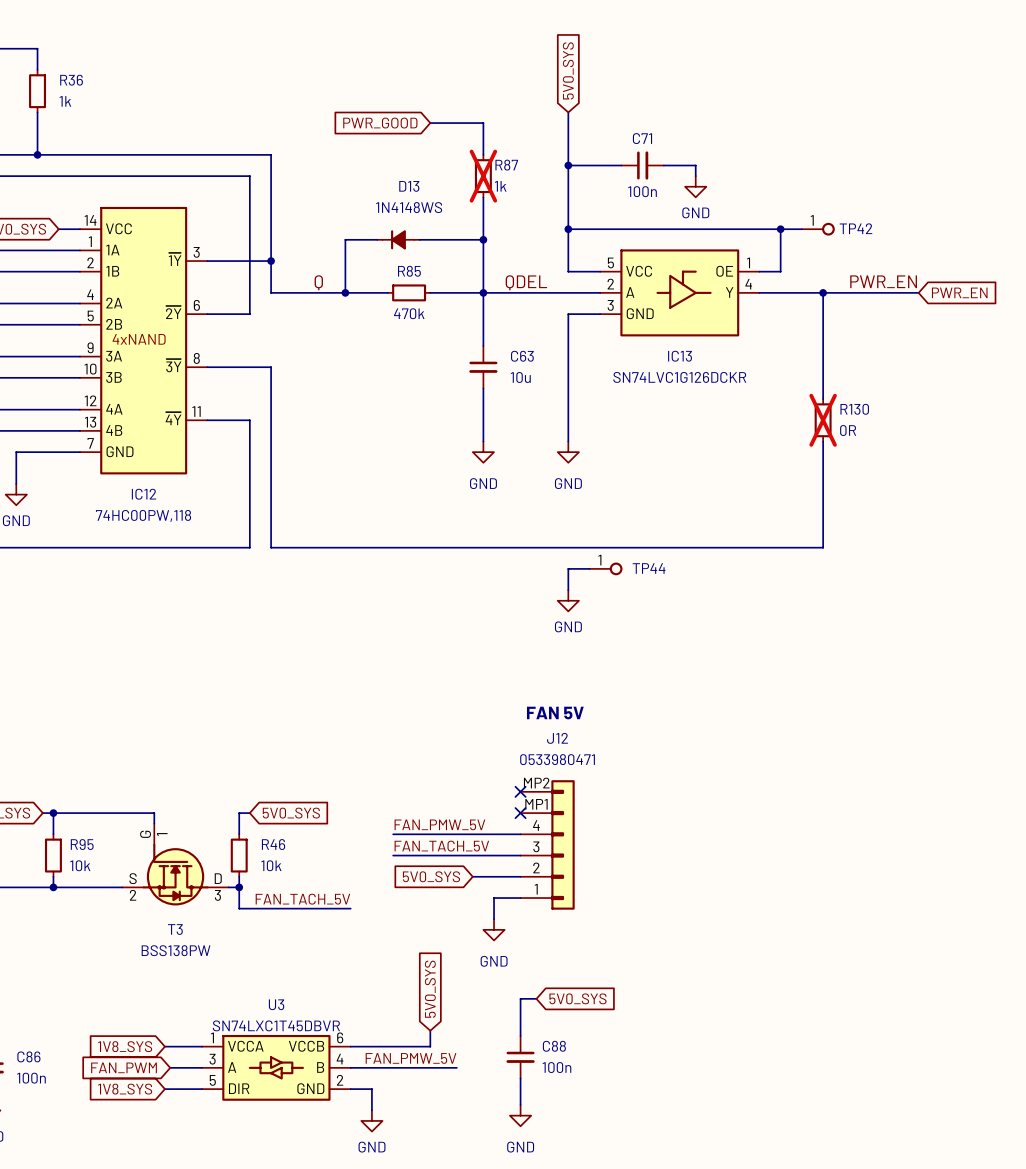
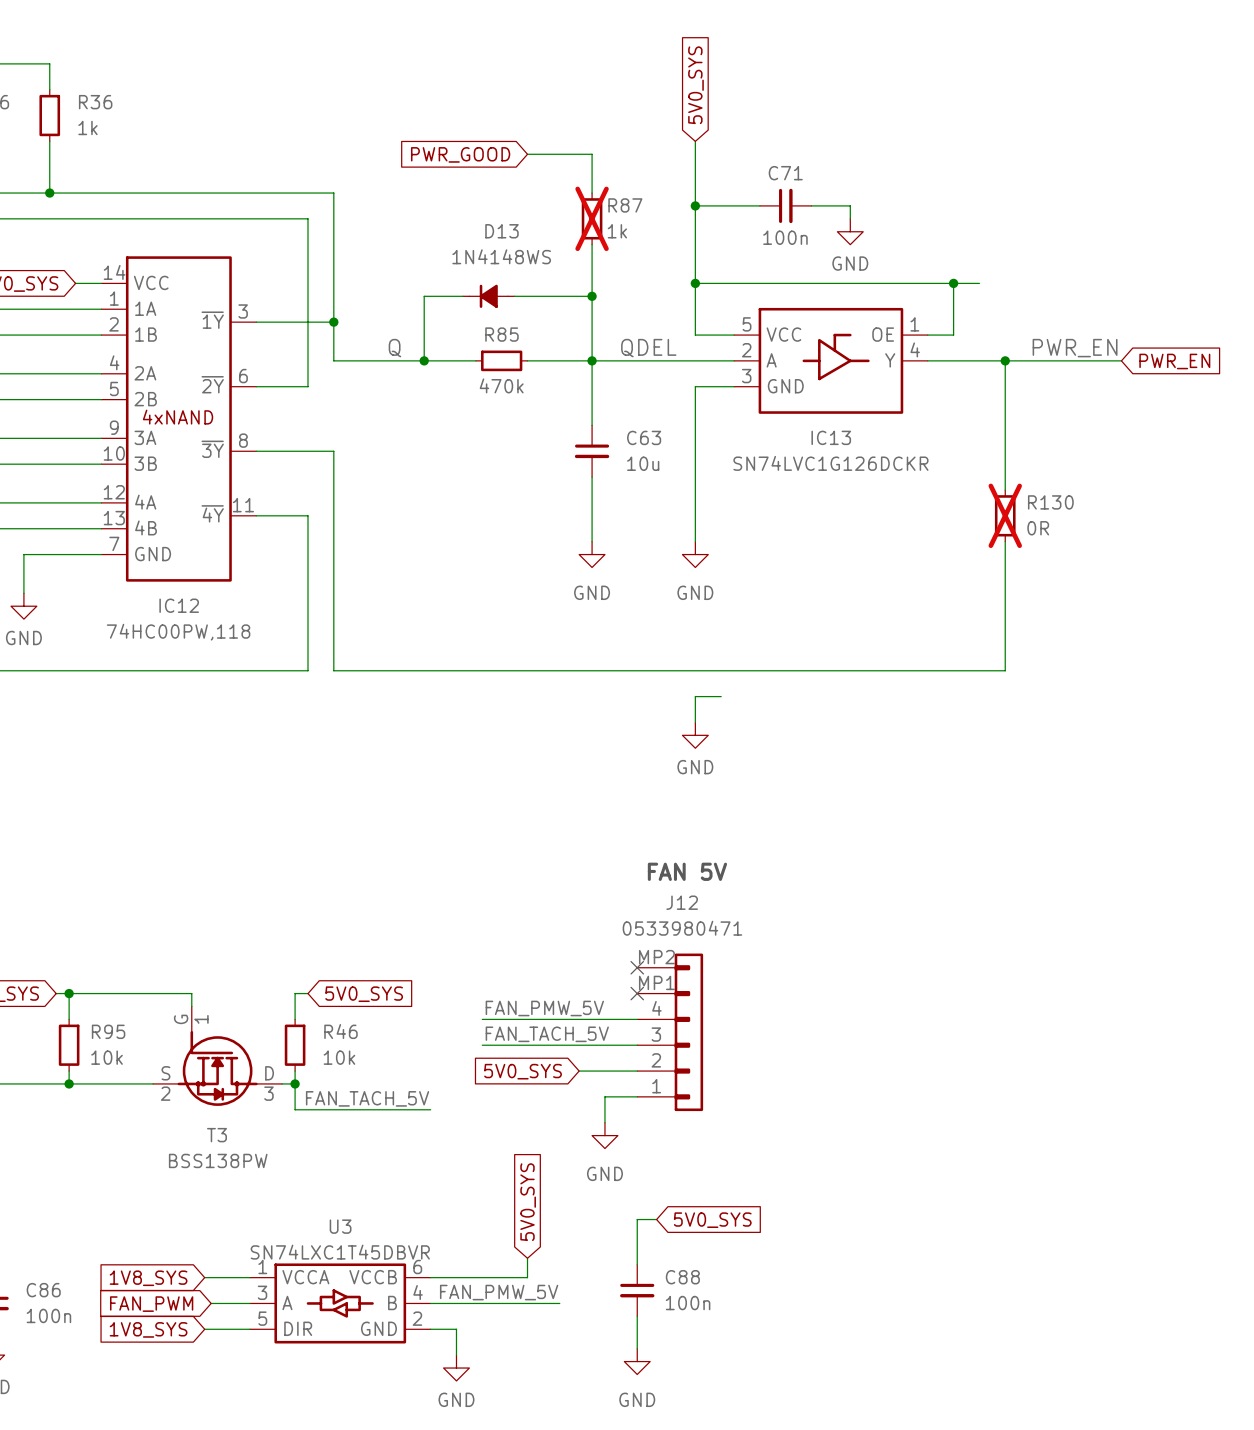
TP42: (818, 229) -> none
TP44: (606, 568) -> none

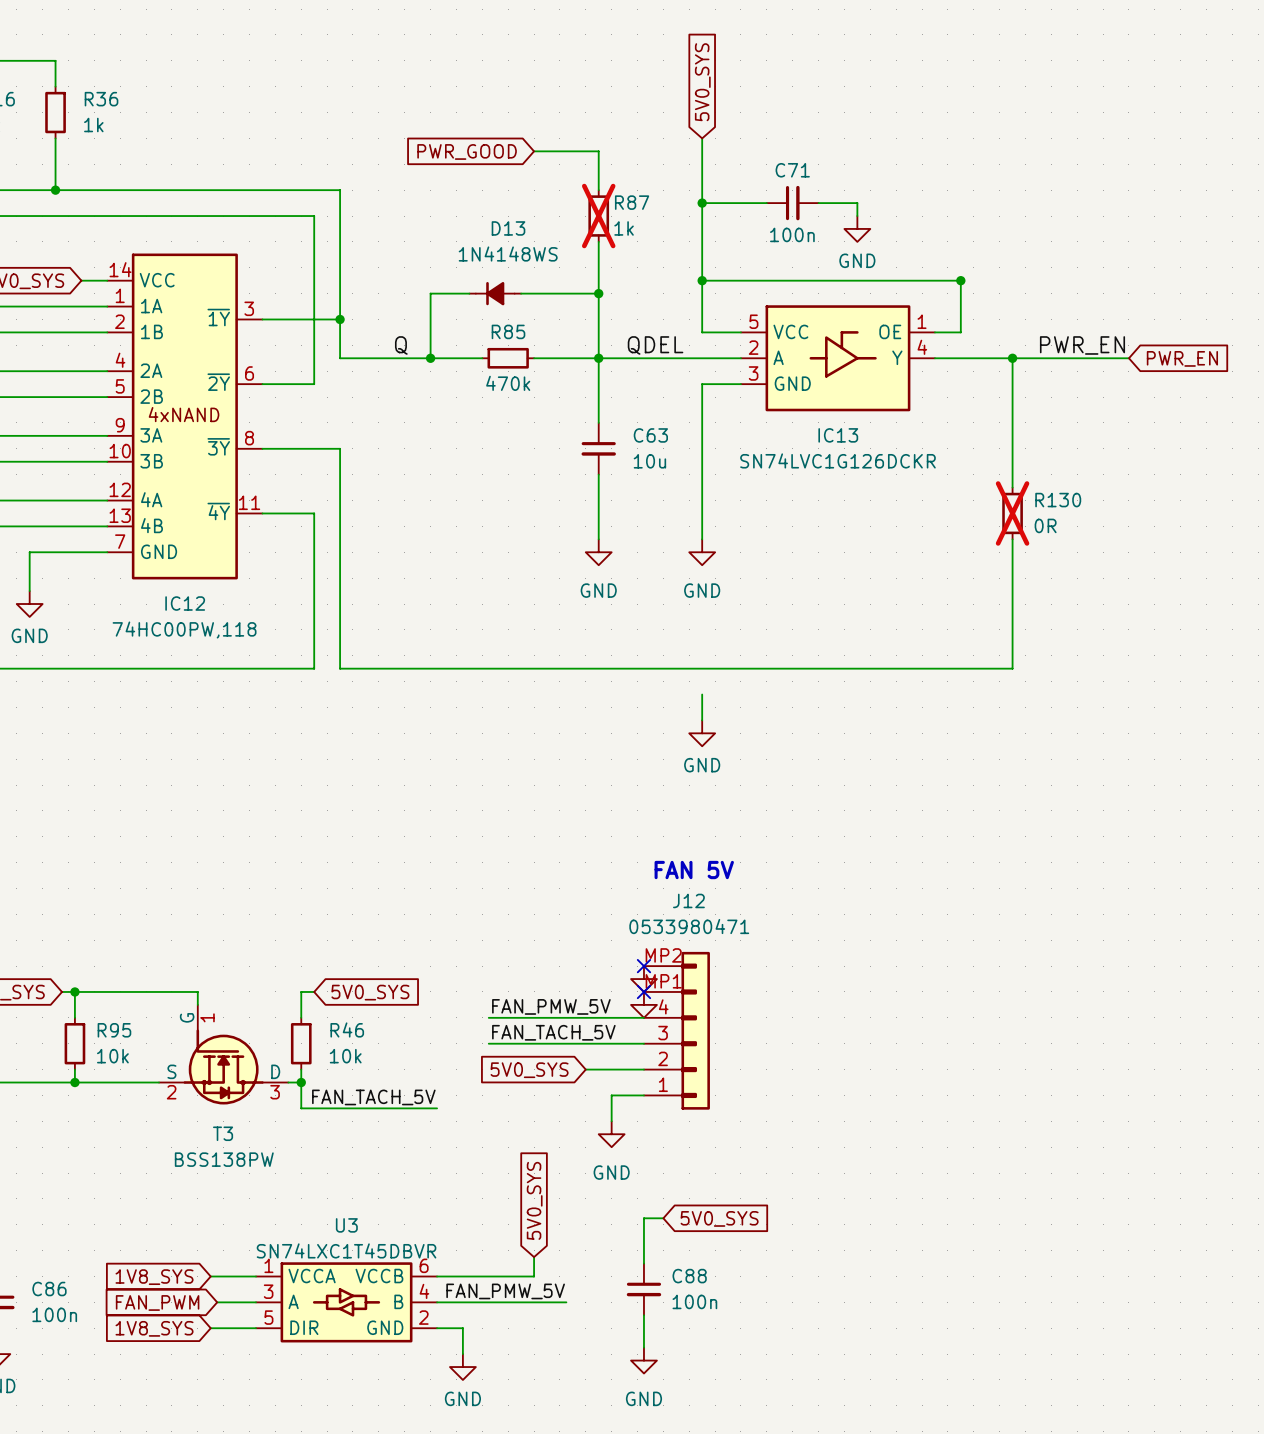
wire: (953, 283) (979, 283) -> none
wire: (695, 696) (721, 696) -> none
power symbol: none -> (643, 979)
power symbol: none -> (643, 1004)

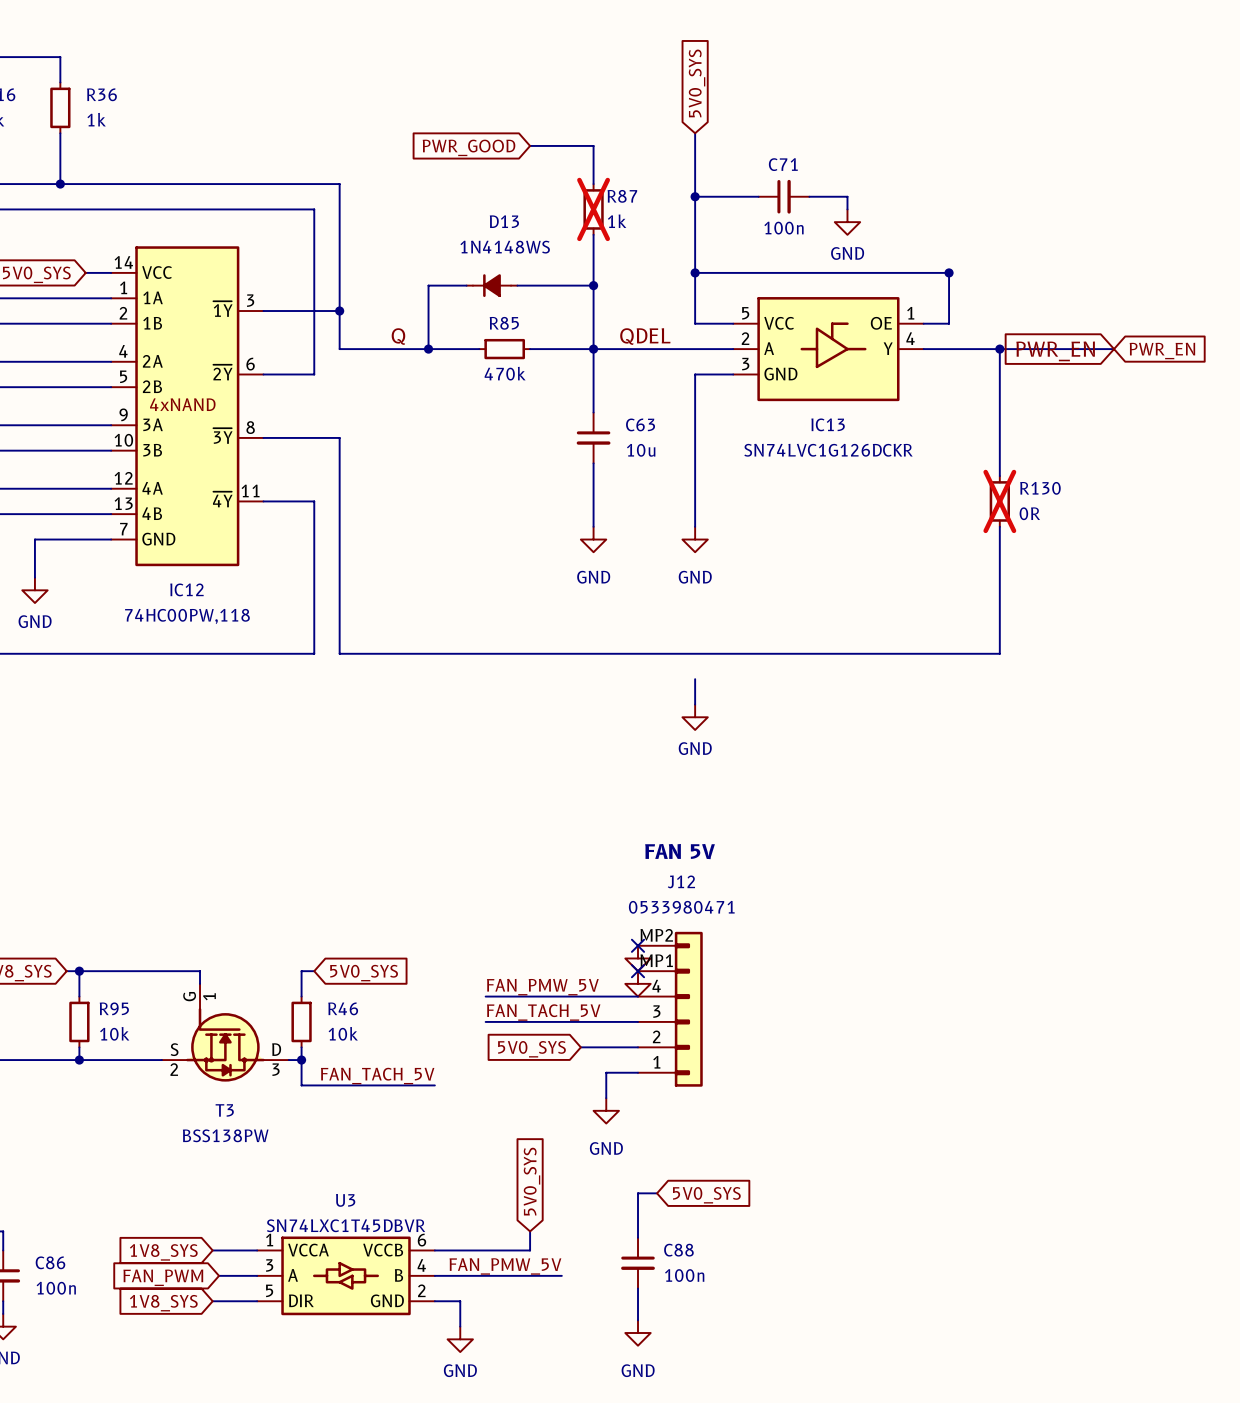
label: PWR_EN (1082, 345) -> none
global label: none -> PWR_EN (1055, 351)

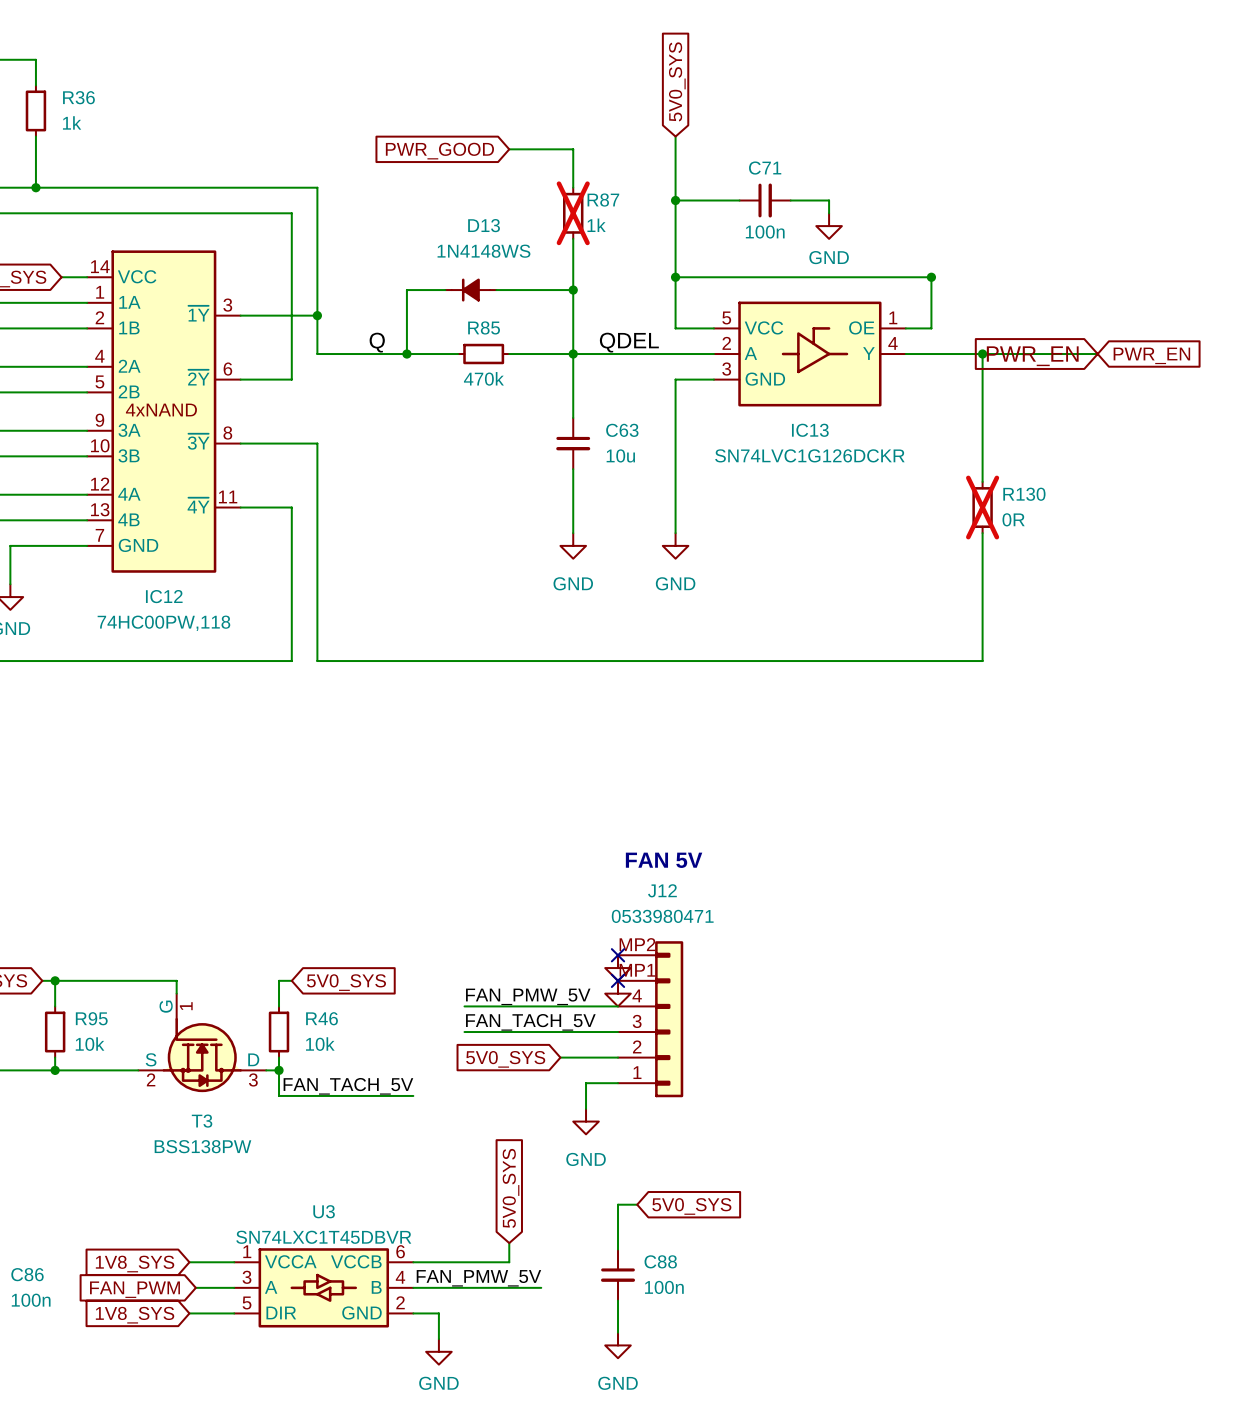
wire: (695, 679) (695, 704) -> none
power symbol: GND (695, 717) -> none

